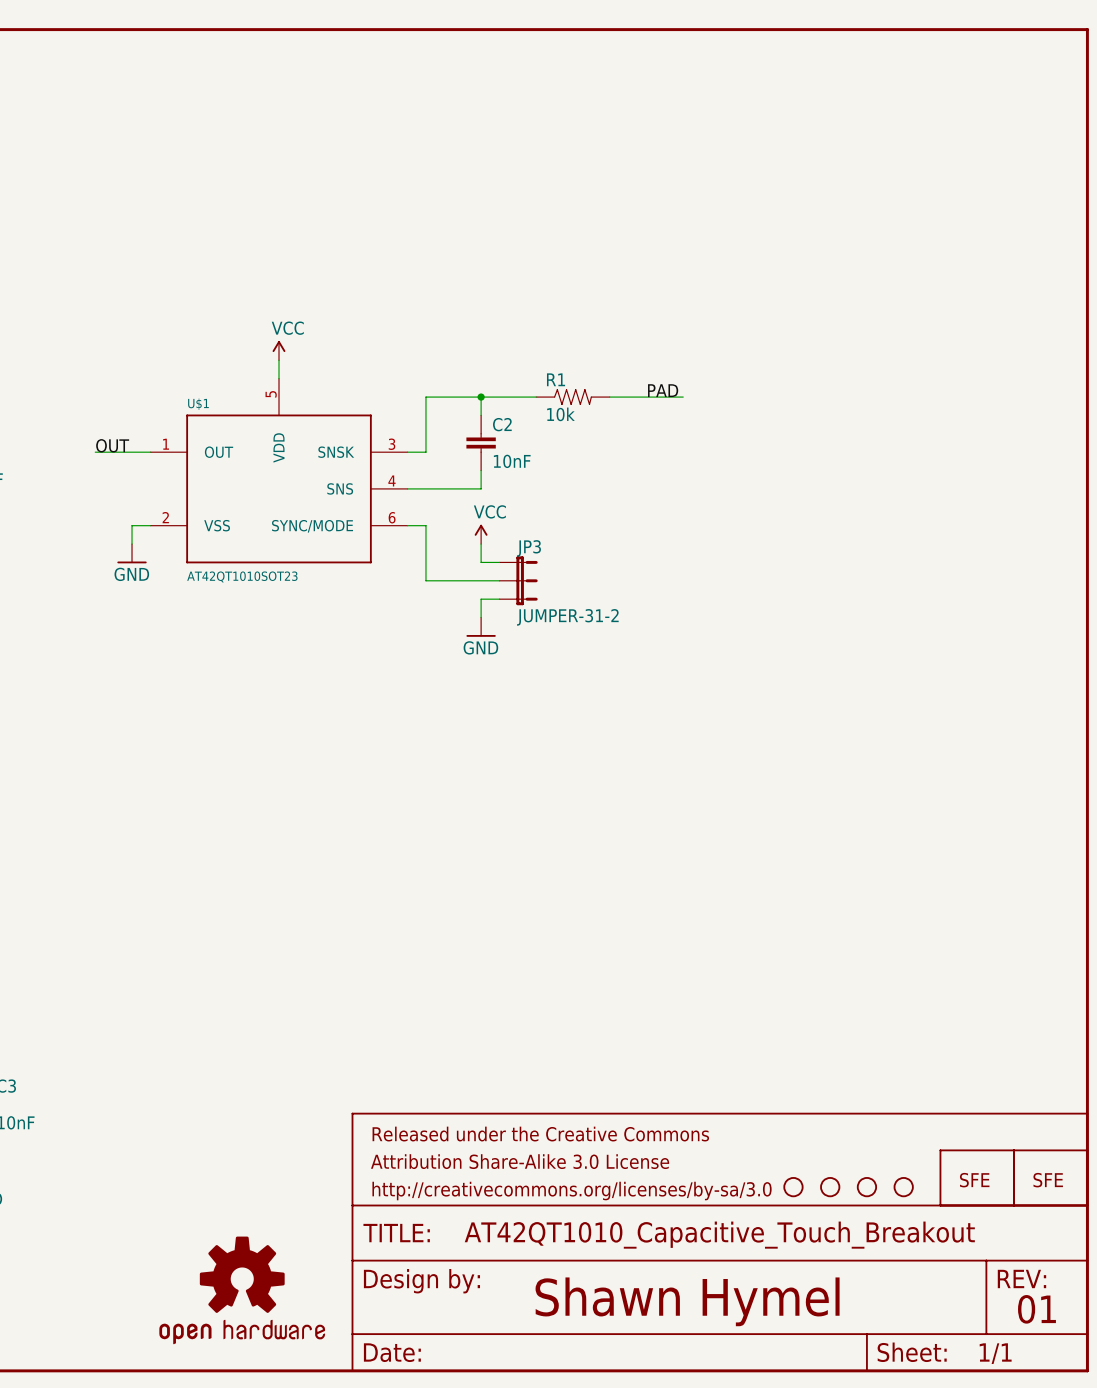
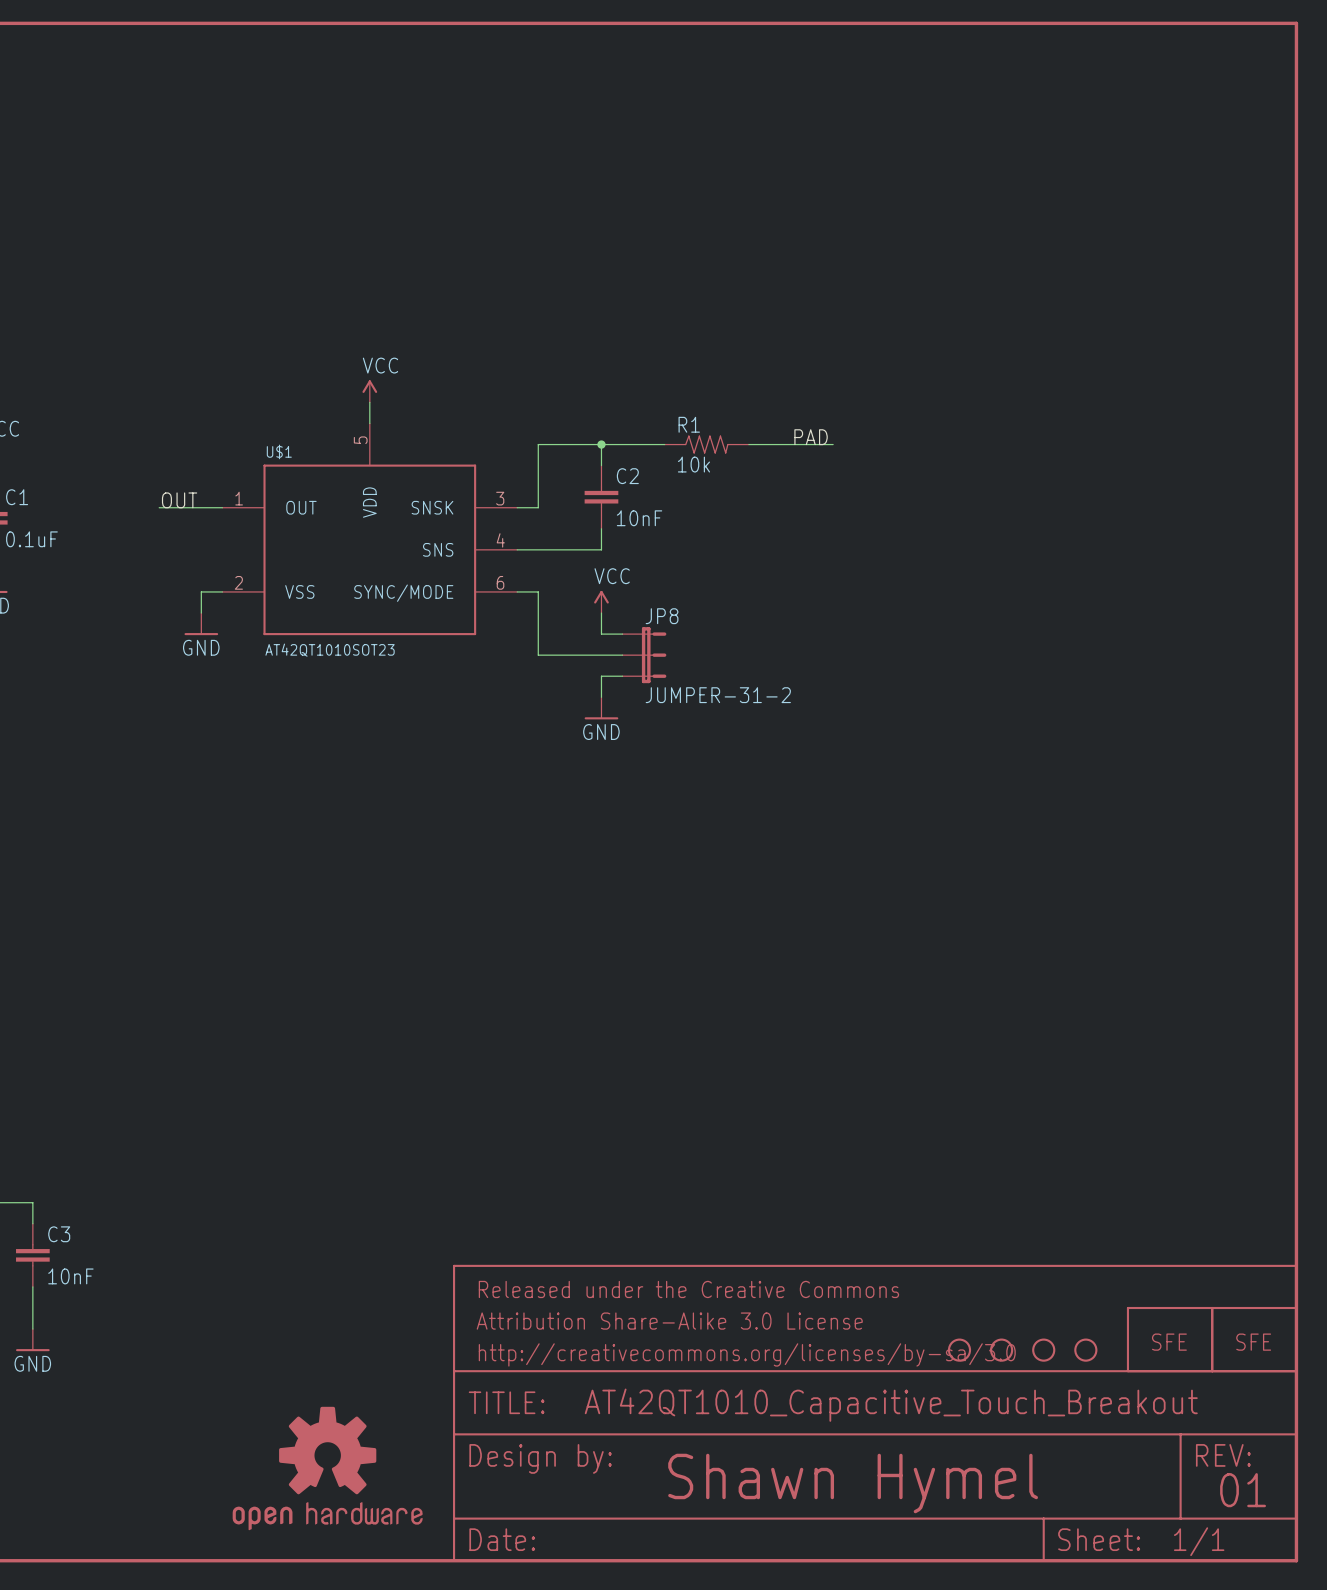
JP3 name: JP3 (528, 548) -> JP8 (662, 616)

